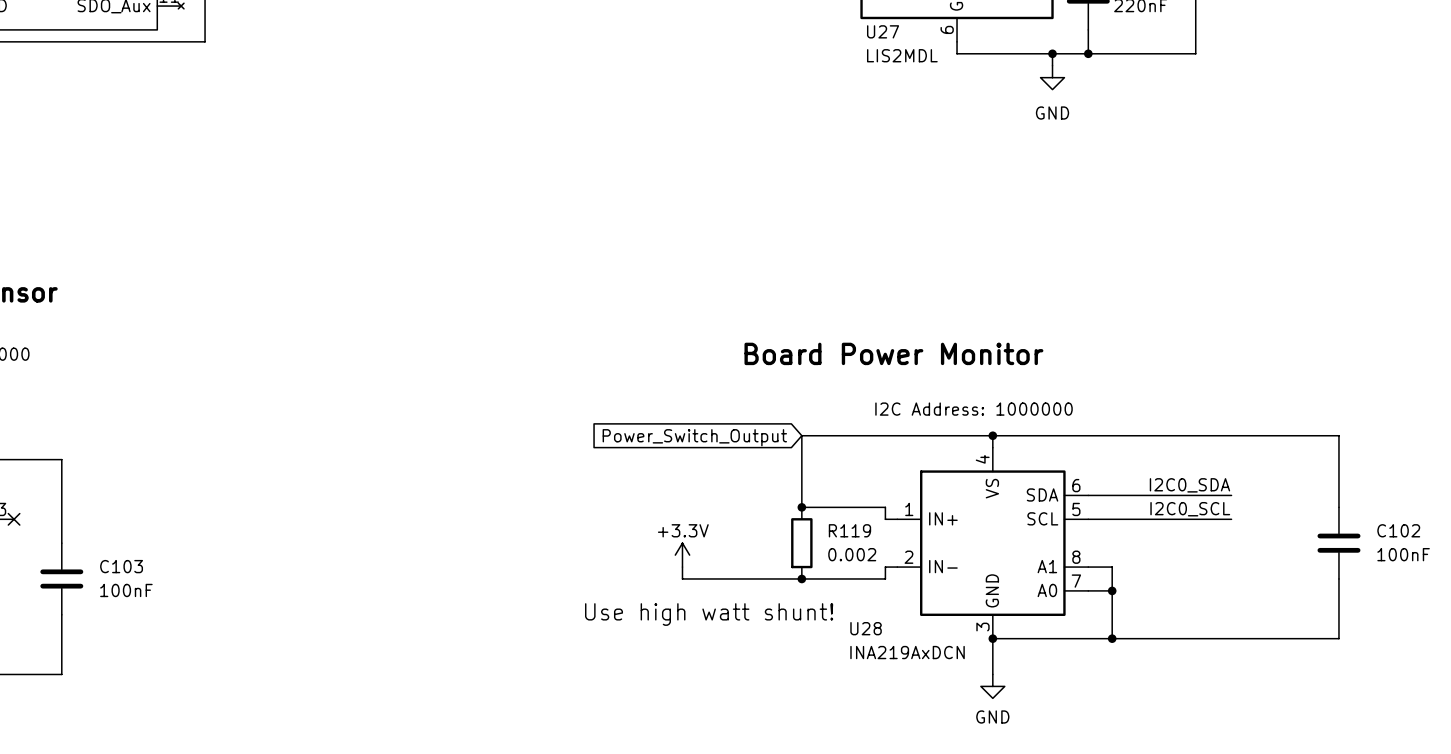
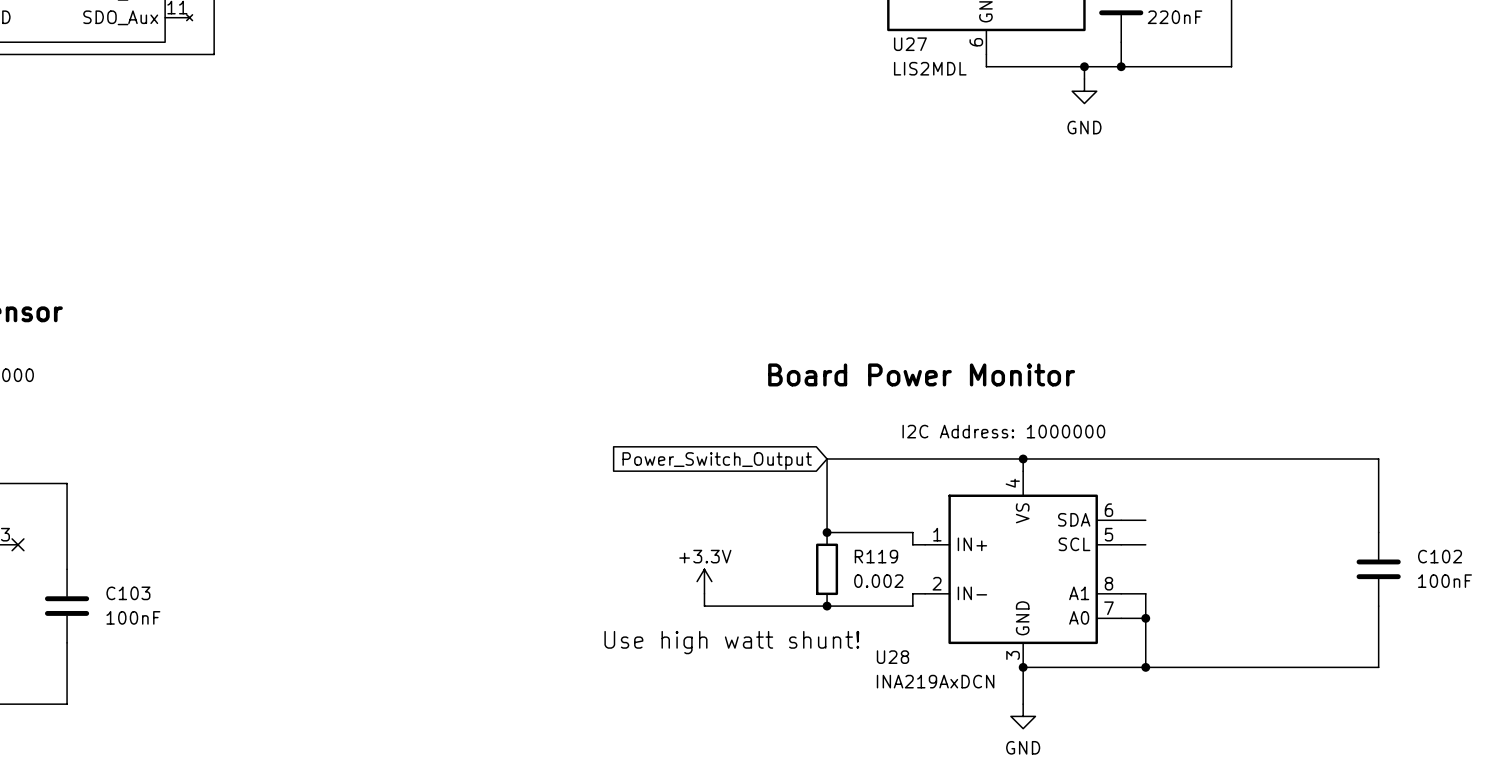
label: I2C0_SDA (1189, 485) -> none
wire: (1112, 495) (1231, 495) -> none
label: I2C0_SCL (1190, 509) -> none
wire: (1112, 519) (1231, 519) -> none

